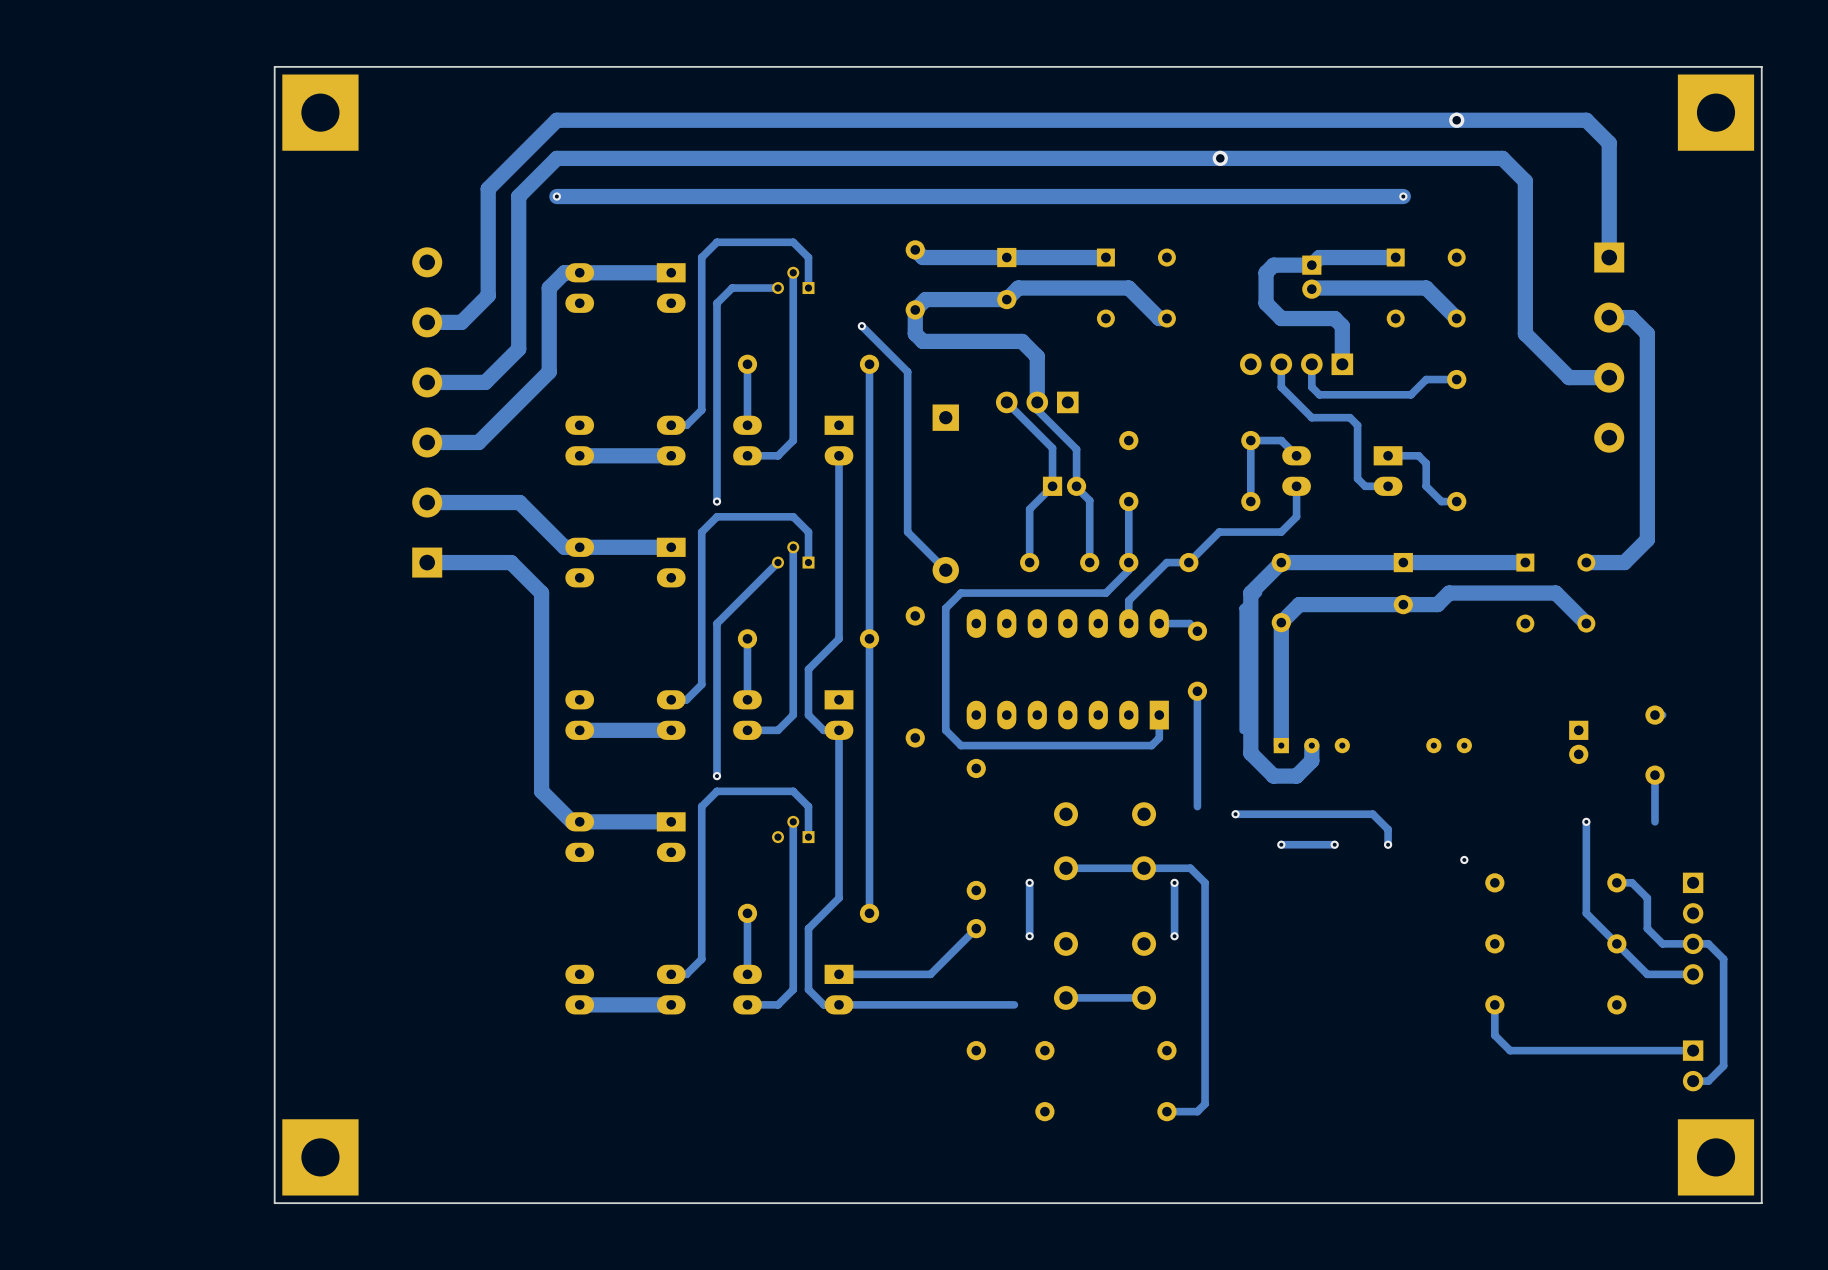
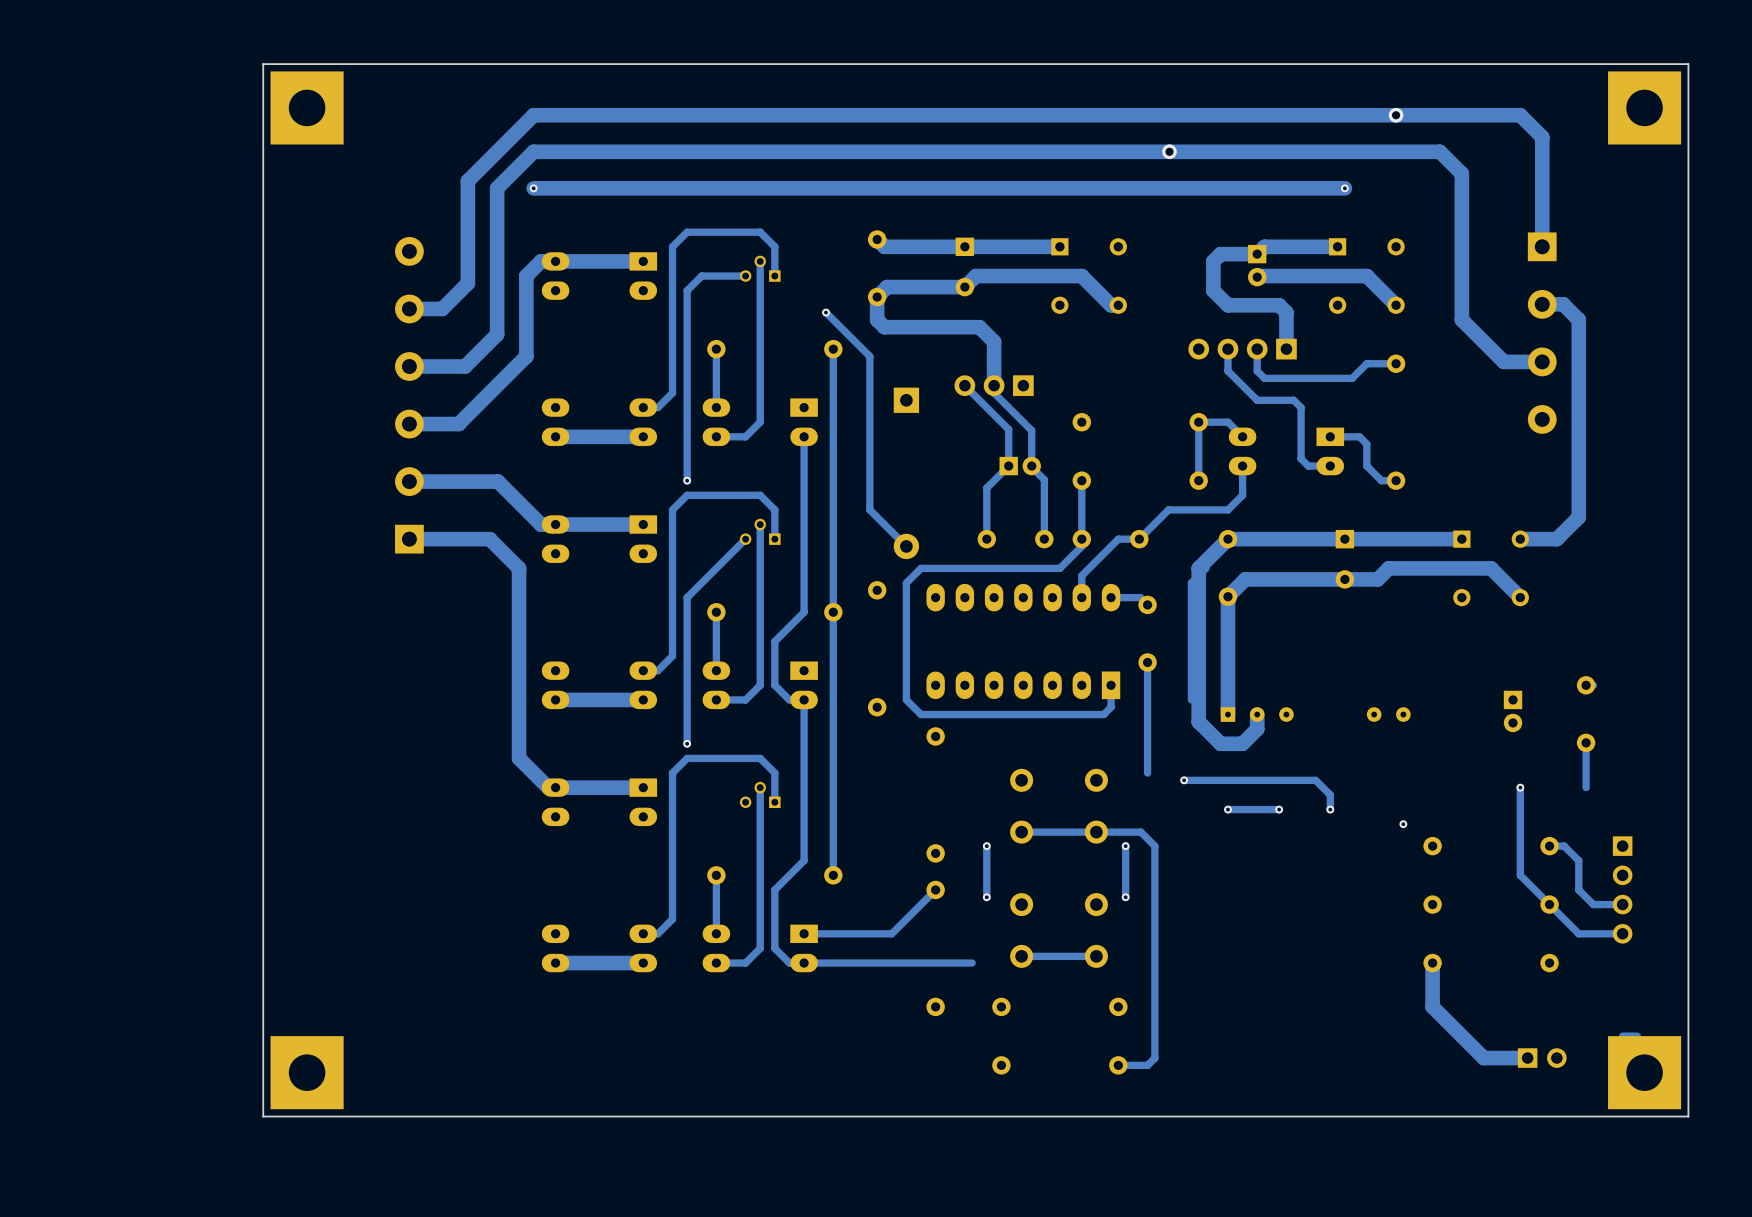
track: (1693, 943) (1708, 943) (1723, 959) (1723, 1065) (1708, 1081) -> none
track width: thin (1494, 1004) (1494, 1035) -> thick (1432, 963) (1432, 992)
track: (1494, 1035) (1510, 1050) (1693, 1050) -> (1432, 992) (1432, 1006) (1483, 1058) (1527, 1058)
part rotation: 0° (1693, 1065) -> 90° counterclockwise (1542, 1058)
part position: (1693, 1065) -> (1542, 1058)
part position: (320, 1157) -> (307, 1072)
part position: (1716, 1157) -> (1644, 1072)
board edge: (1761, 1165) (1761, 1203) (274, 1203) (274, 1165) -> (1688, 1116) (263, 1116)

